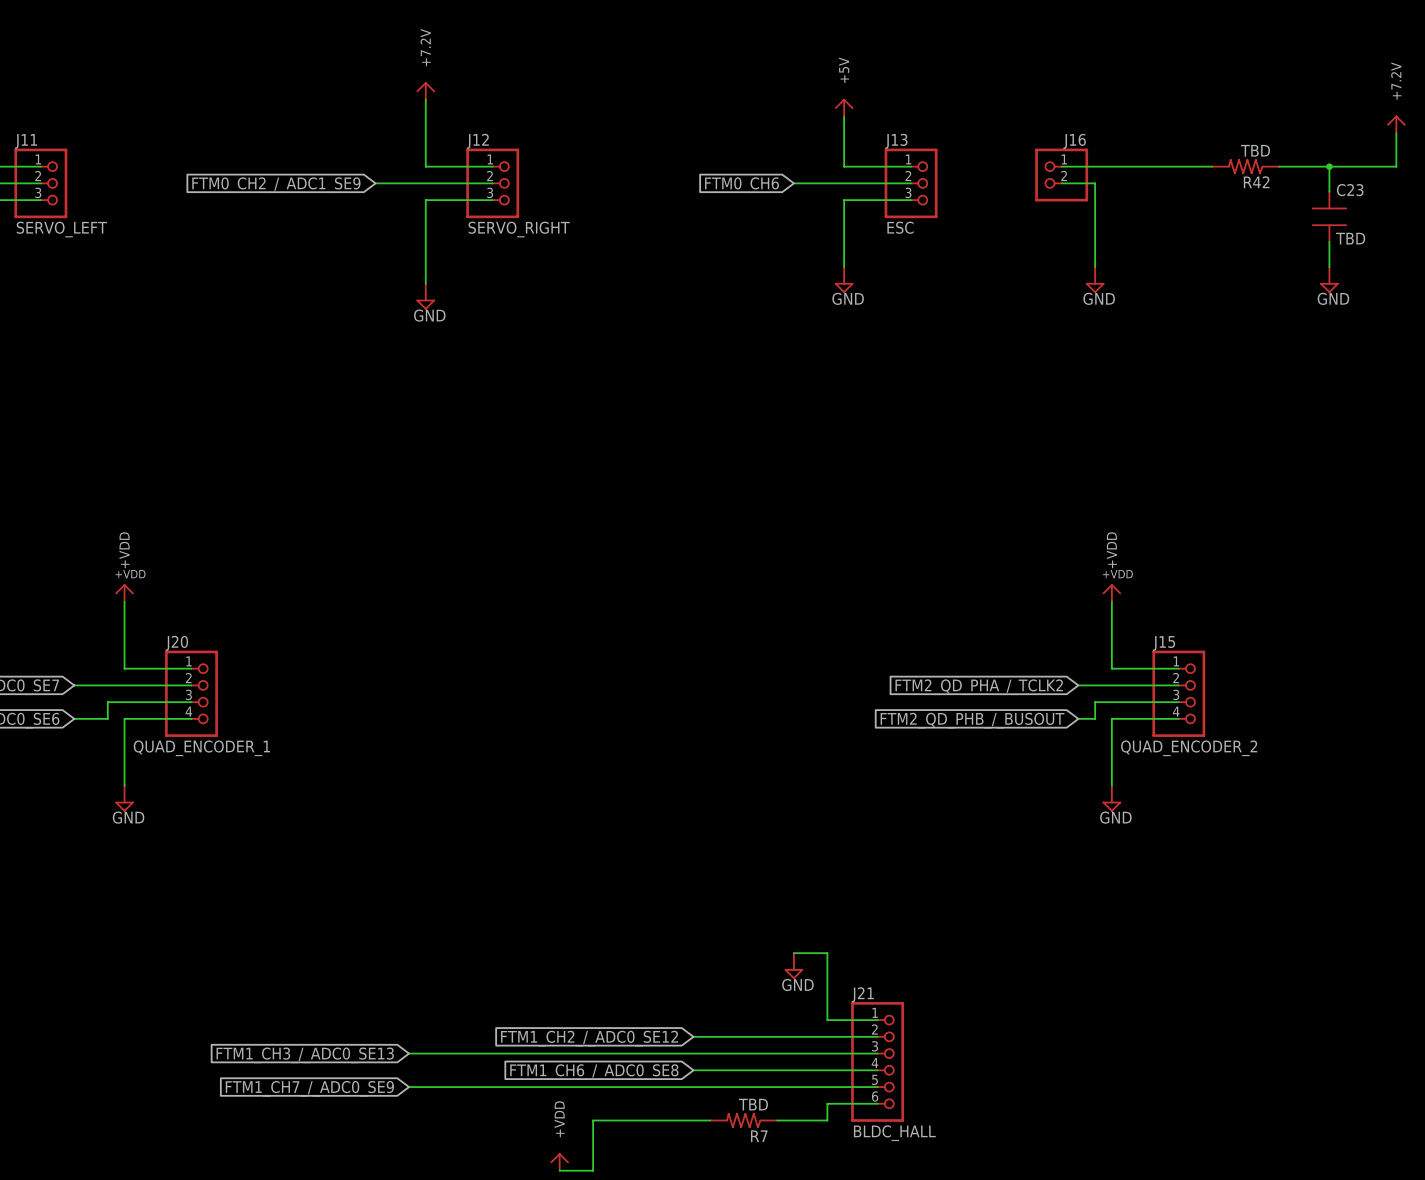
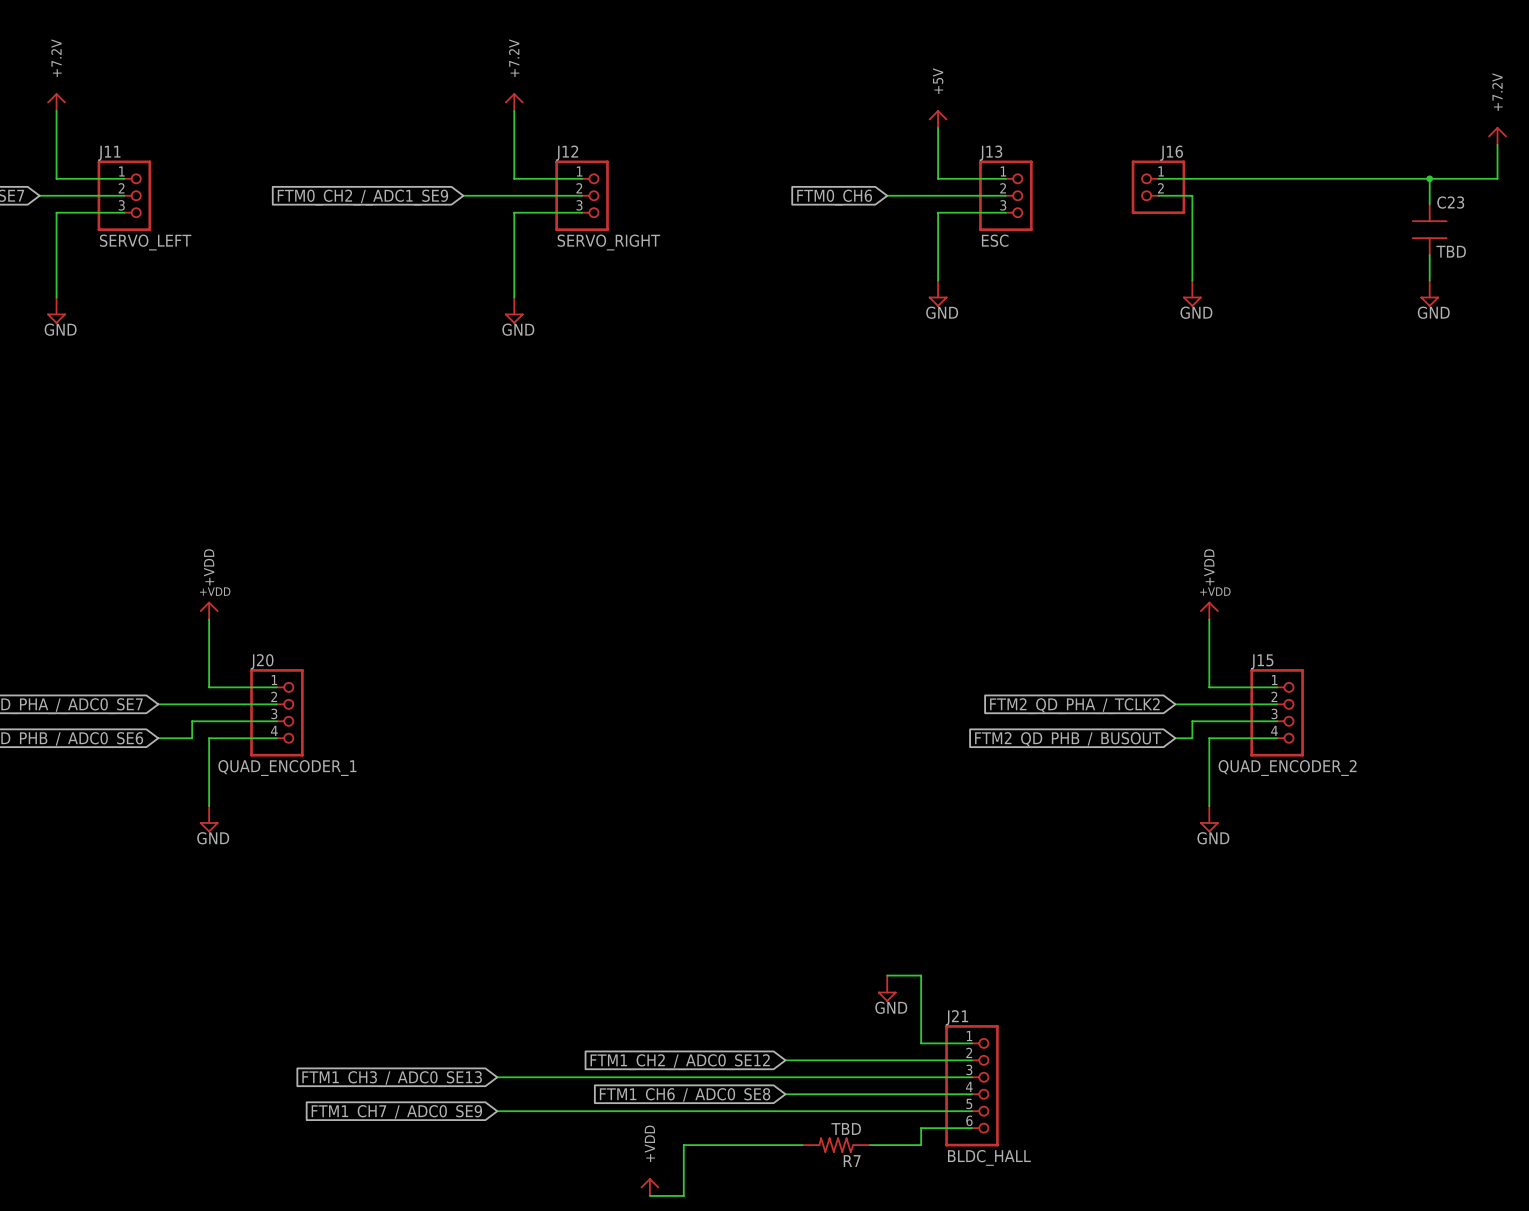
R42: TBD (1245, 166) -> none

